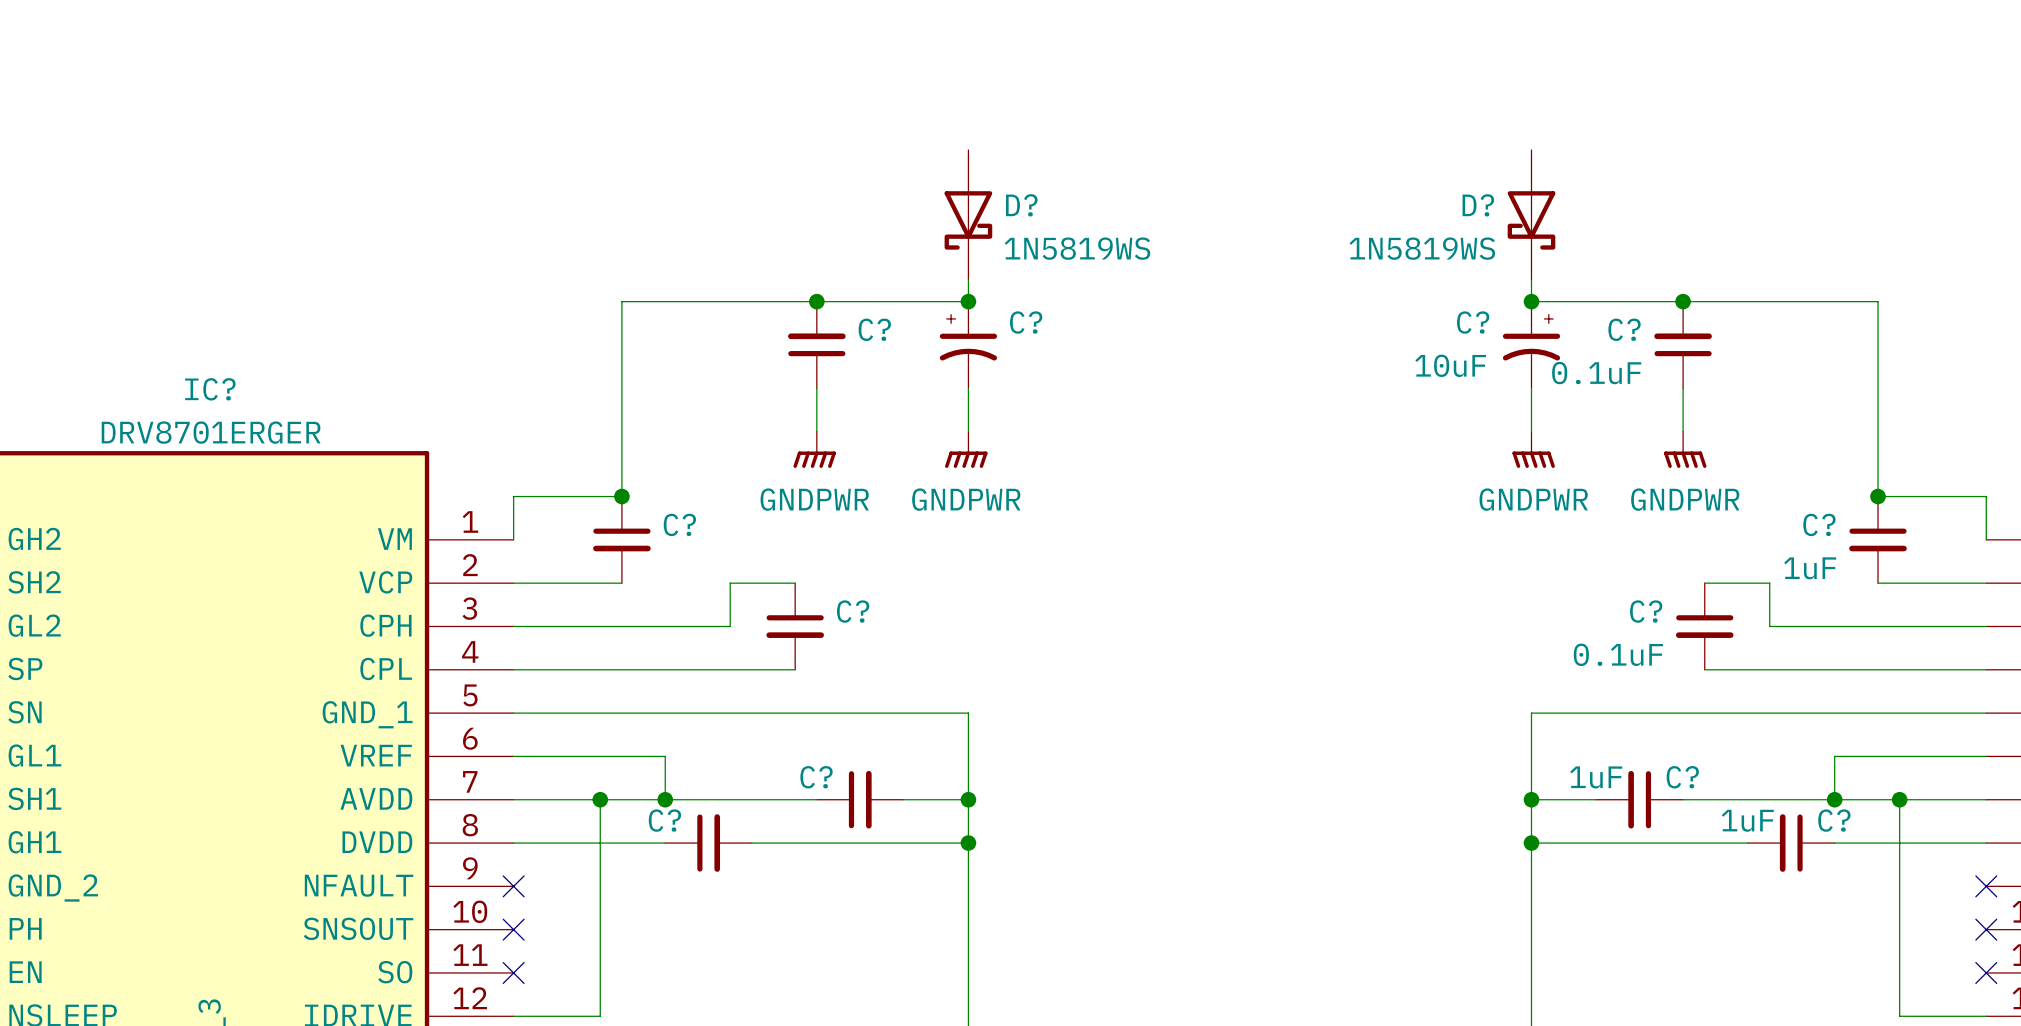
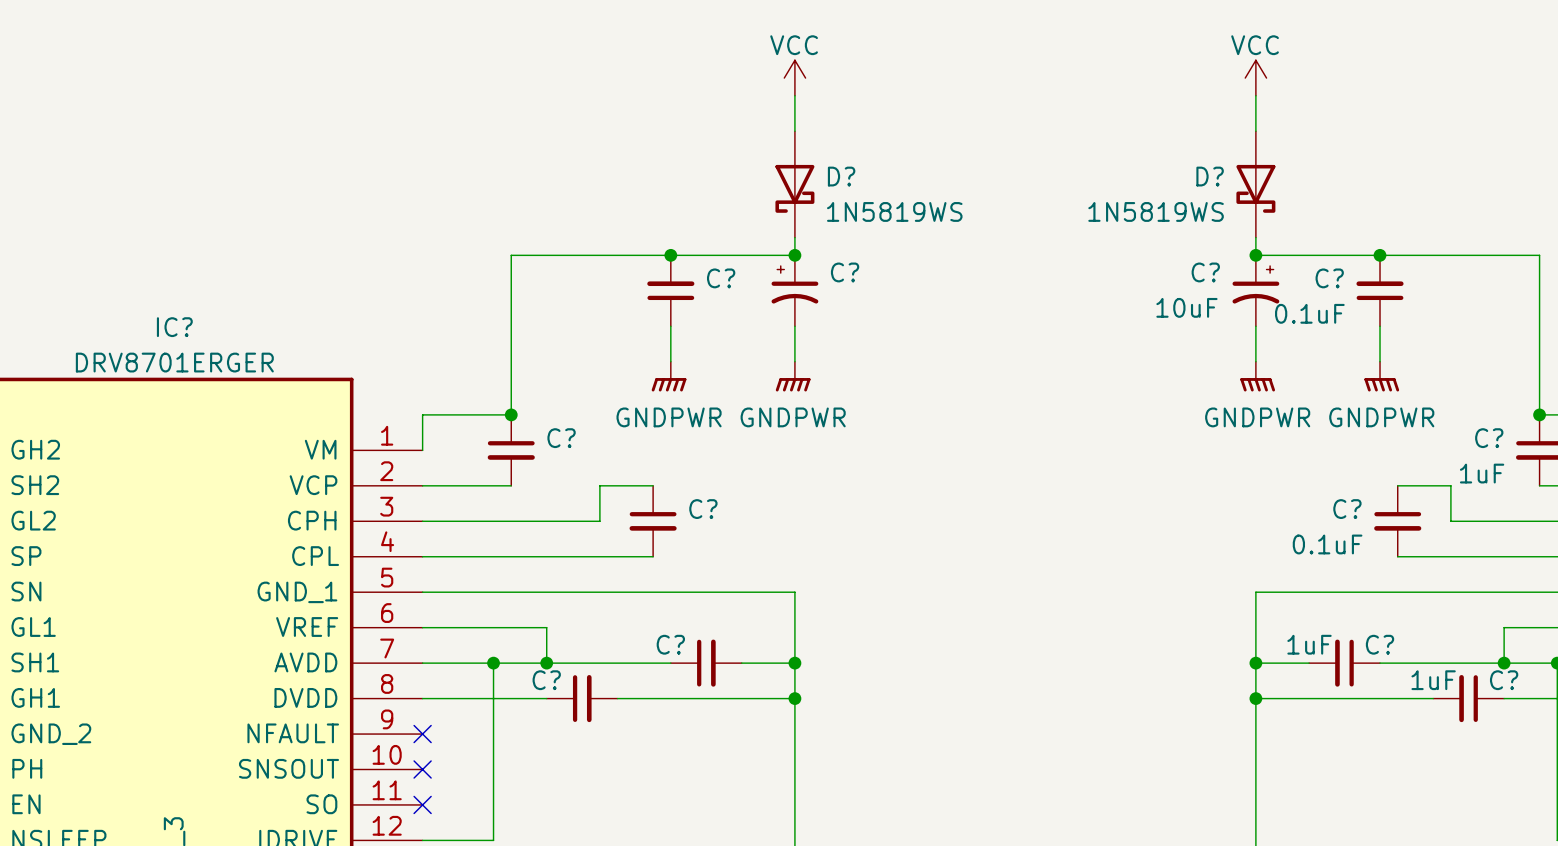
power symbol: none -> VCC (794, 78)
power symbol: none -> VCC (1255, 78)
wire: none -> (794, 95) (794, 131)
wire: none -> (1255, 95) (1255, 131)

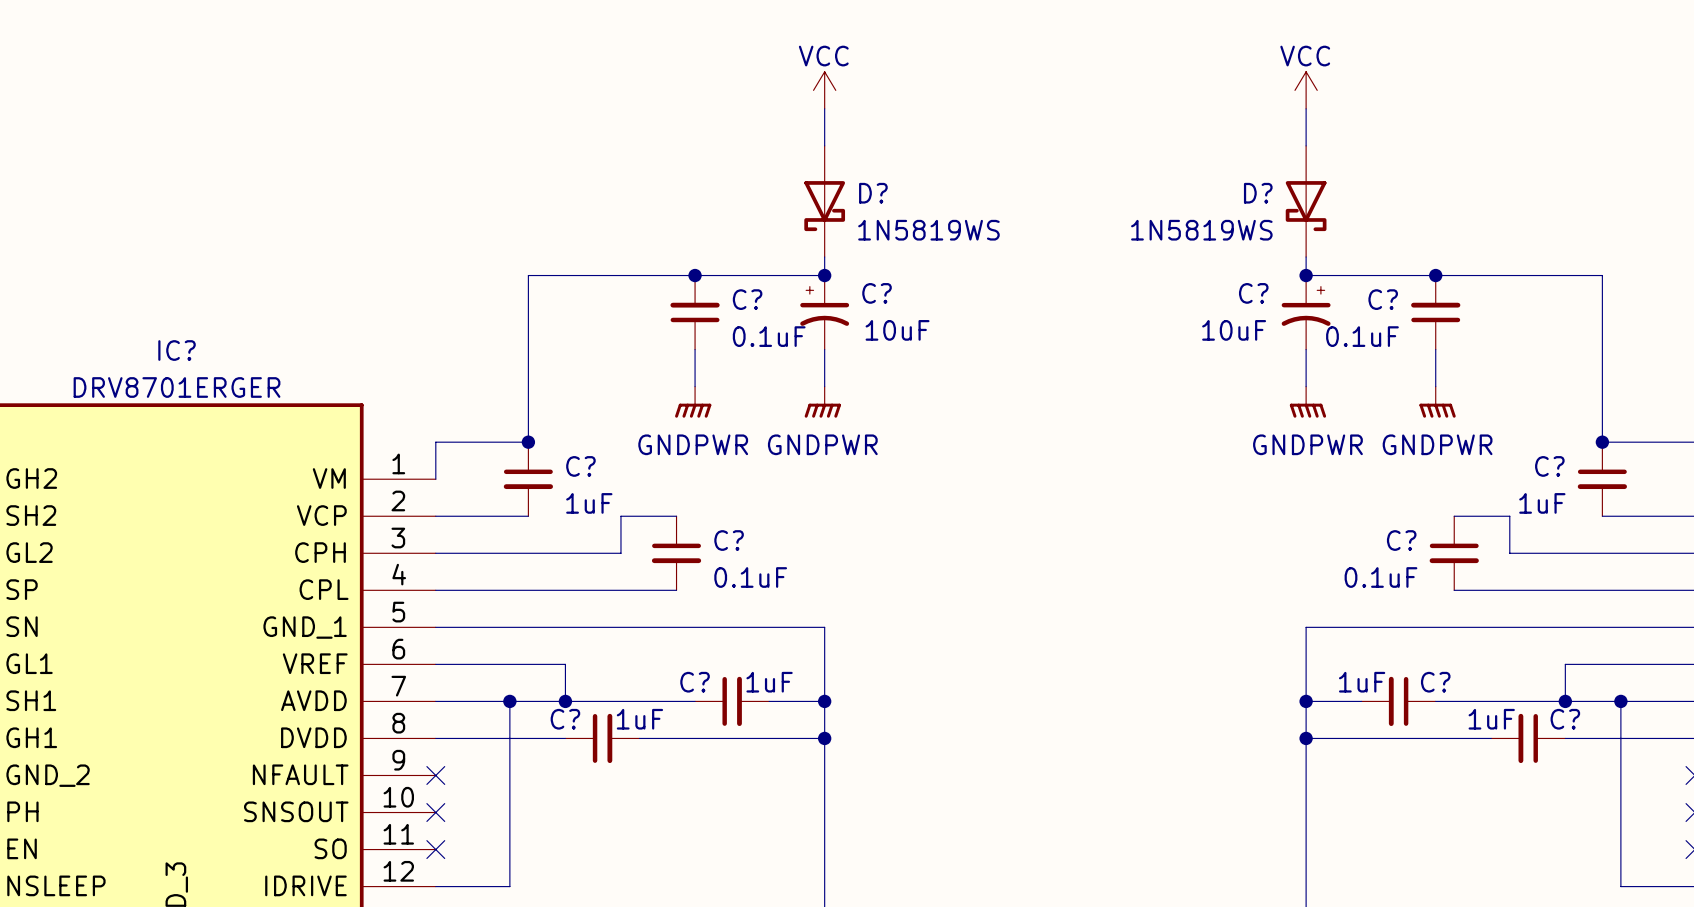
C? value: none -> 10uF (897, 330)
C? value: none -> 0.1uF (769, 336)
C? value: none -> 1uF (589, 503)
C? value: none -> 0.1uF (750, 577)
C? value: none -> 1uF (769, 682)
C? value: none -> 1uF (639, 719)

